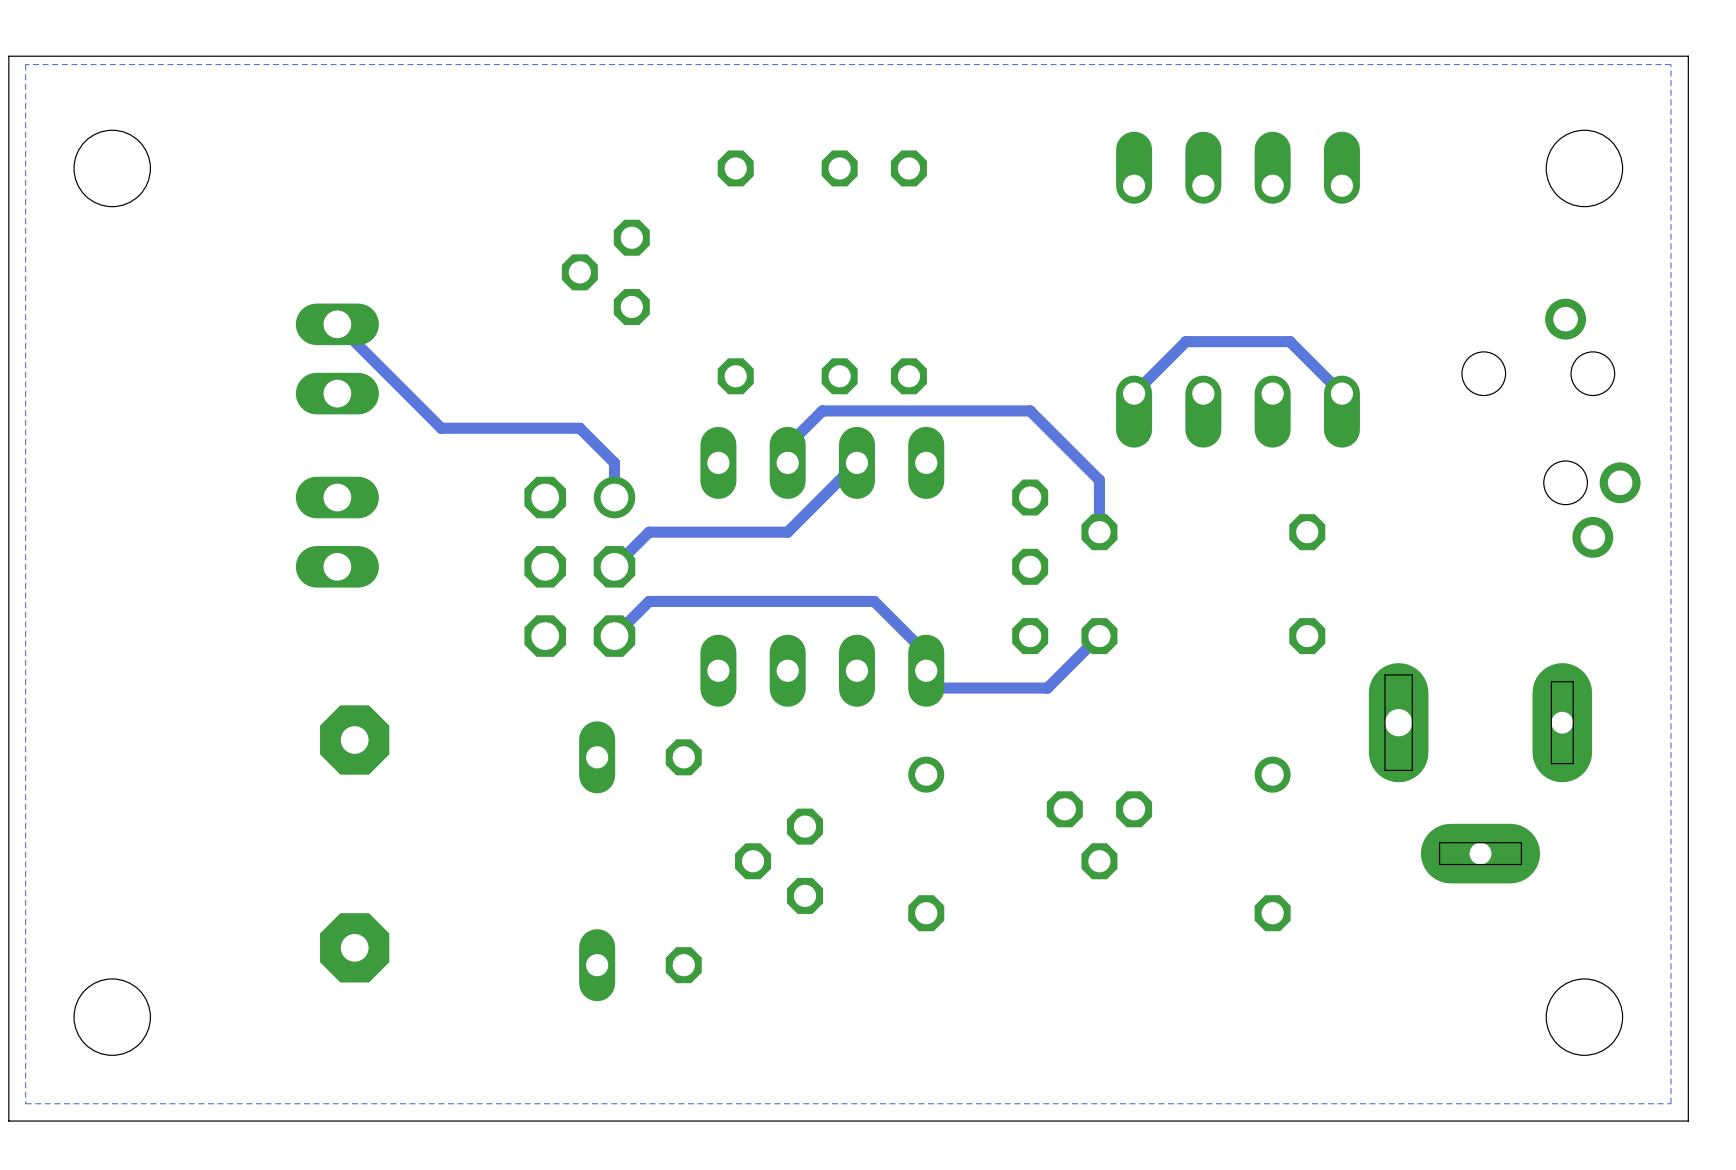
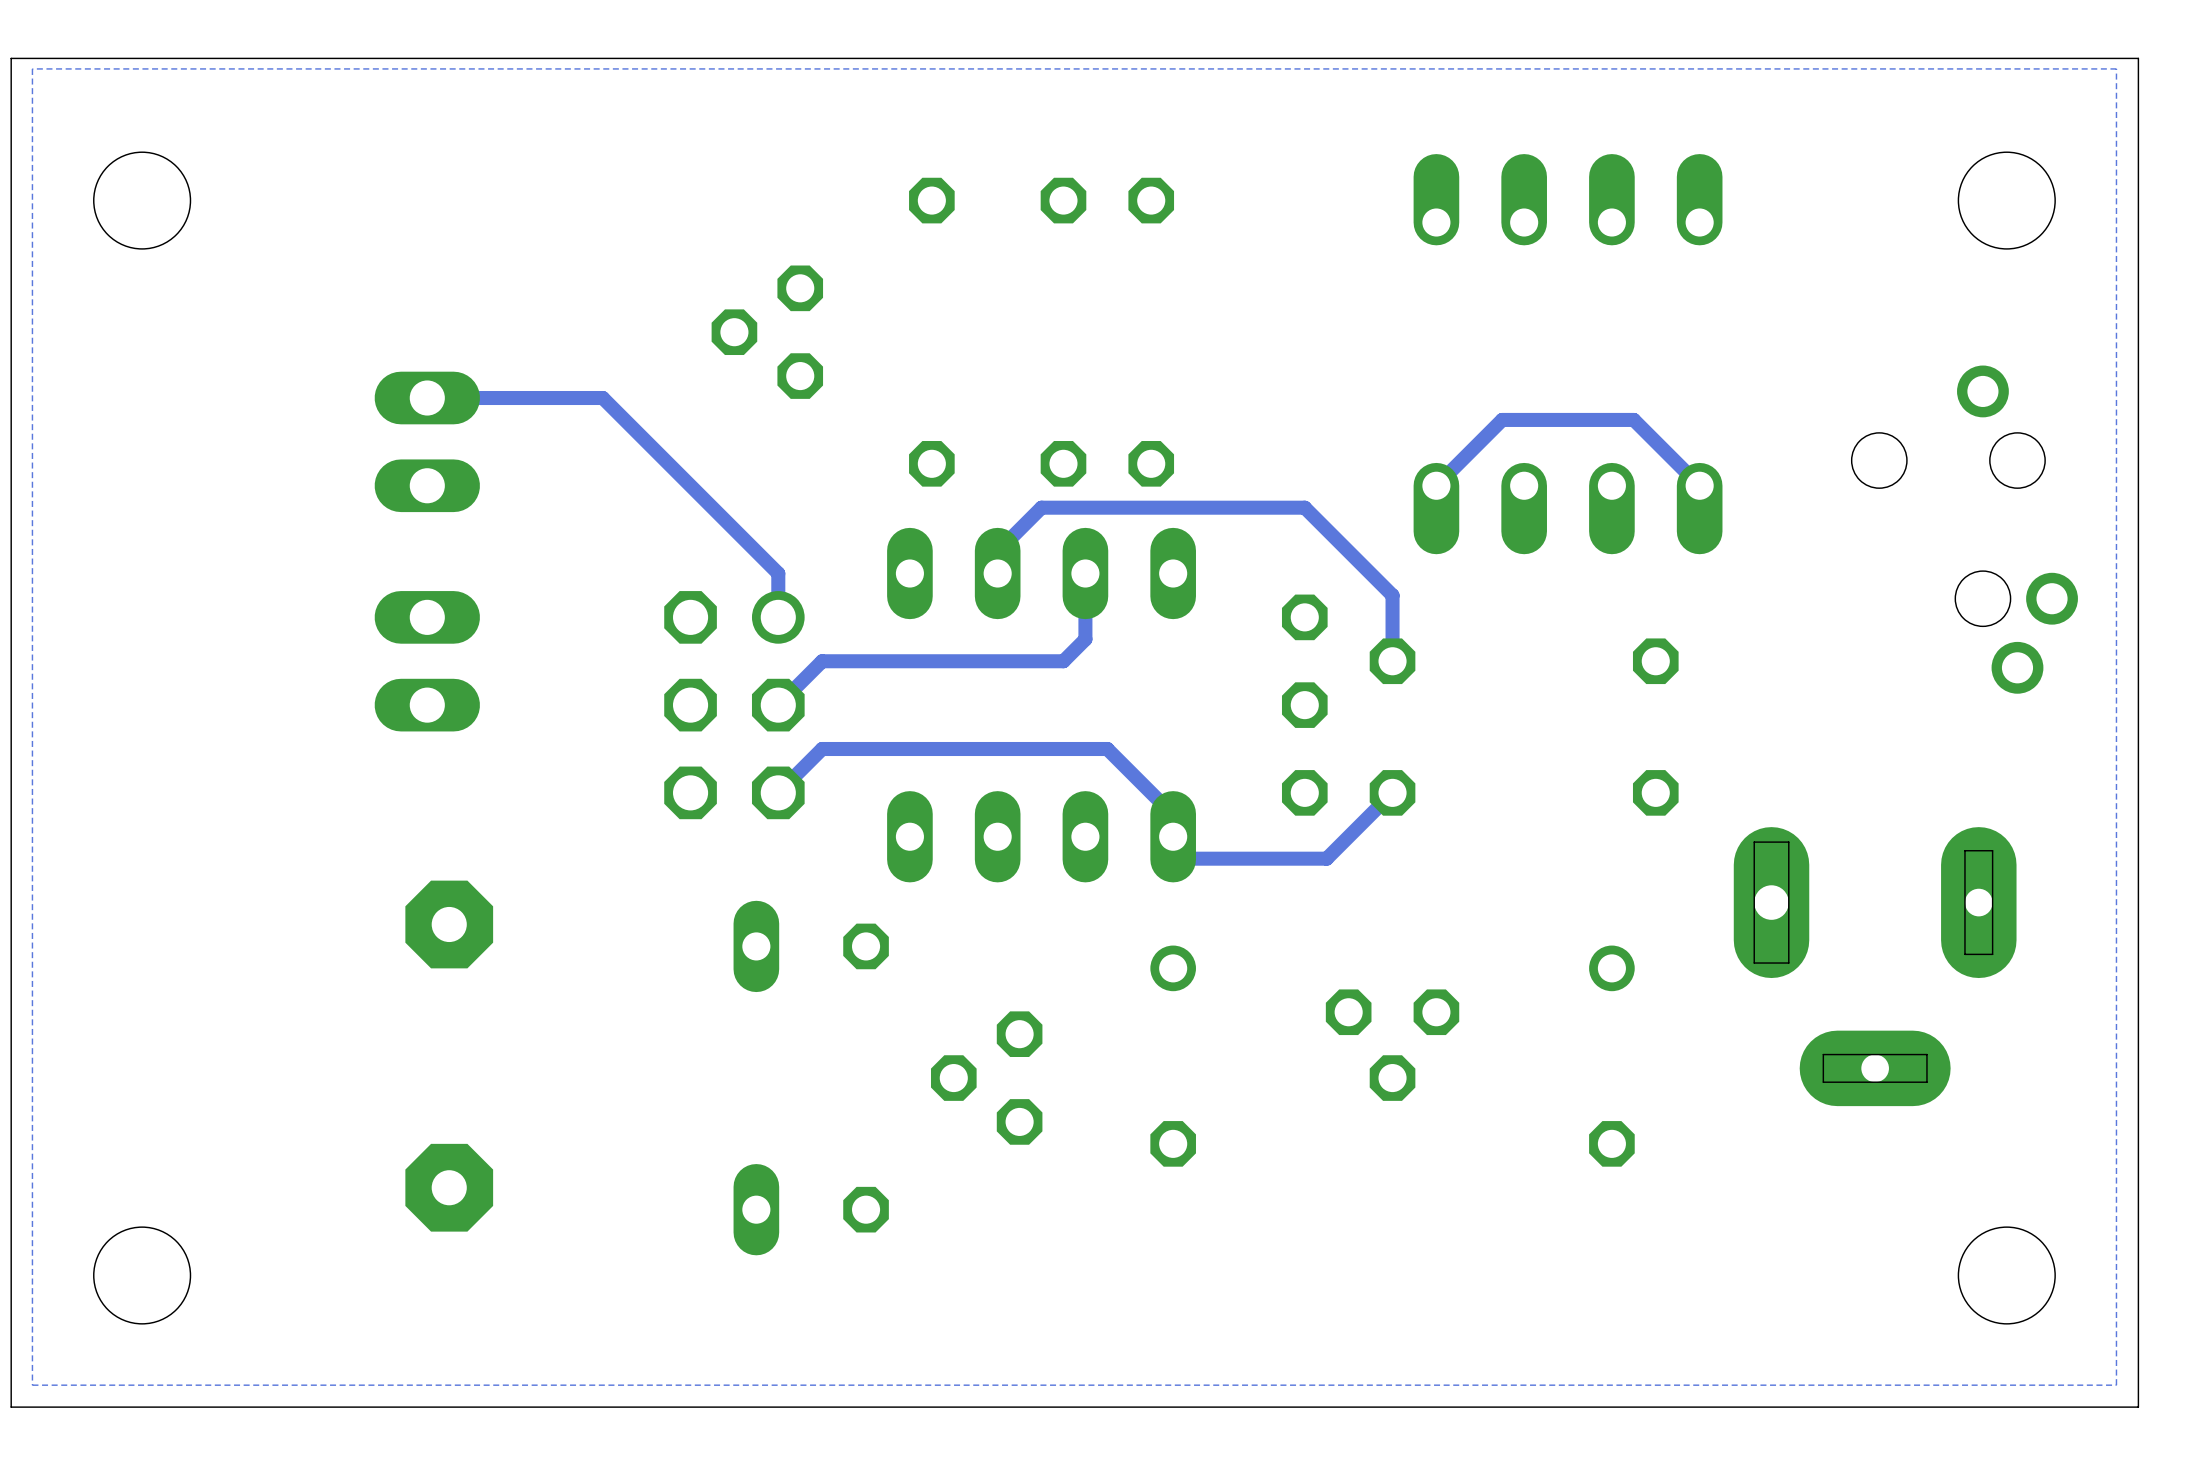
track: (337, 324) (441, 428) (579, 428) -> (427, 398) (602, 398) (734, 529)
track: (856, 462) (787, 532) -> (1085, 573) (1085, 639) (1063, 661) (997, 661)

